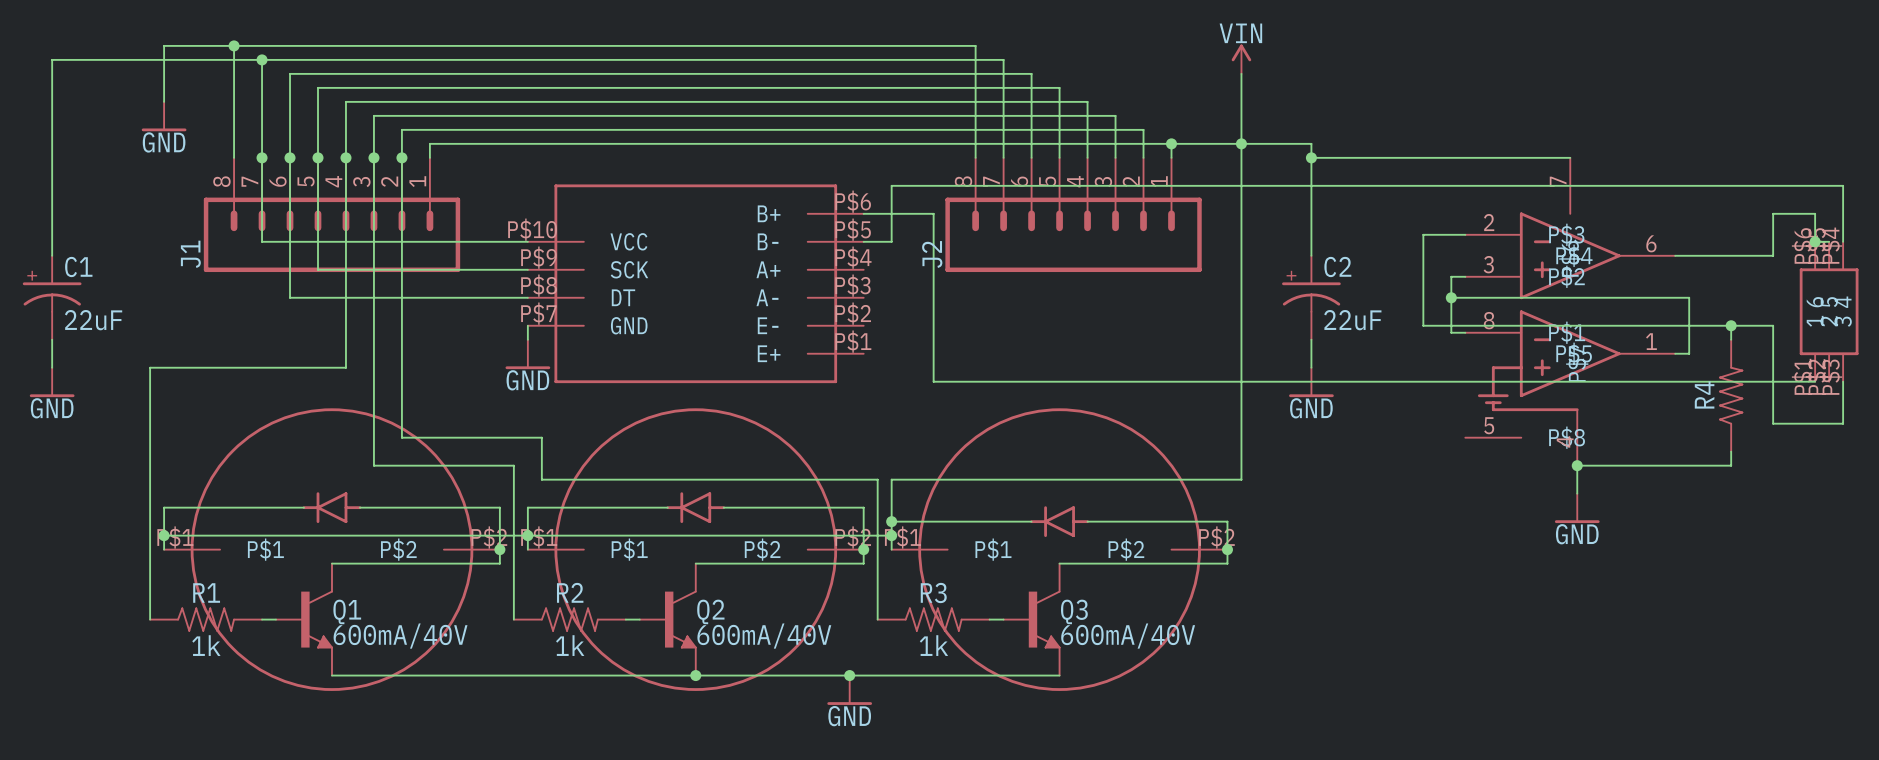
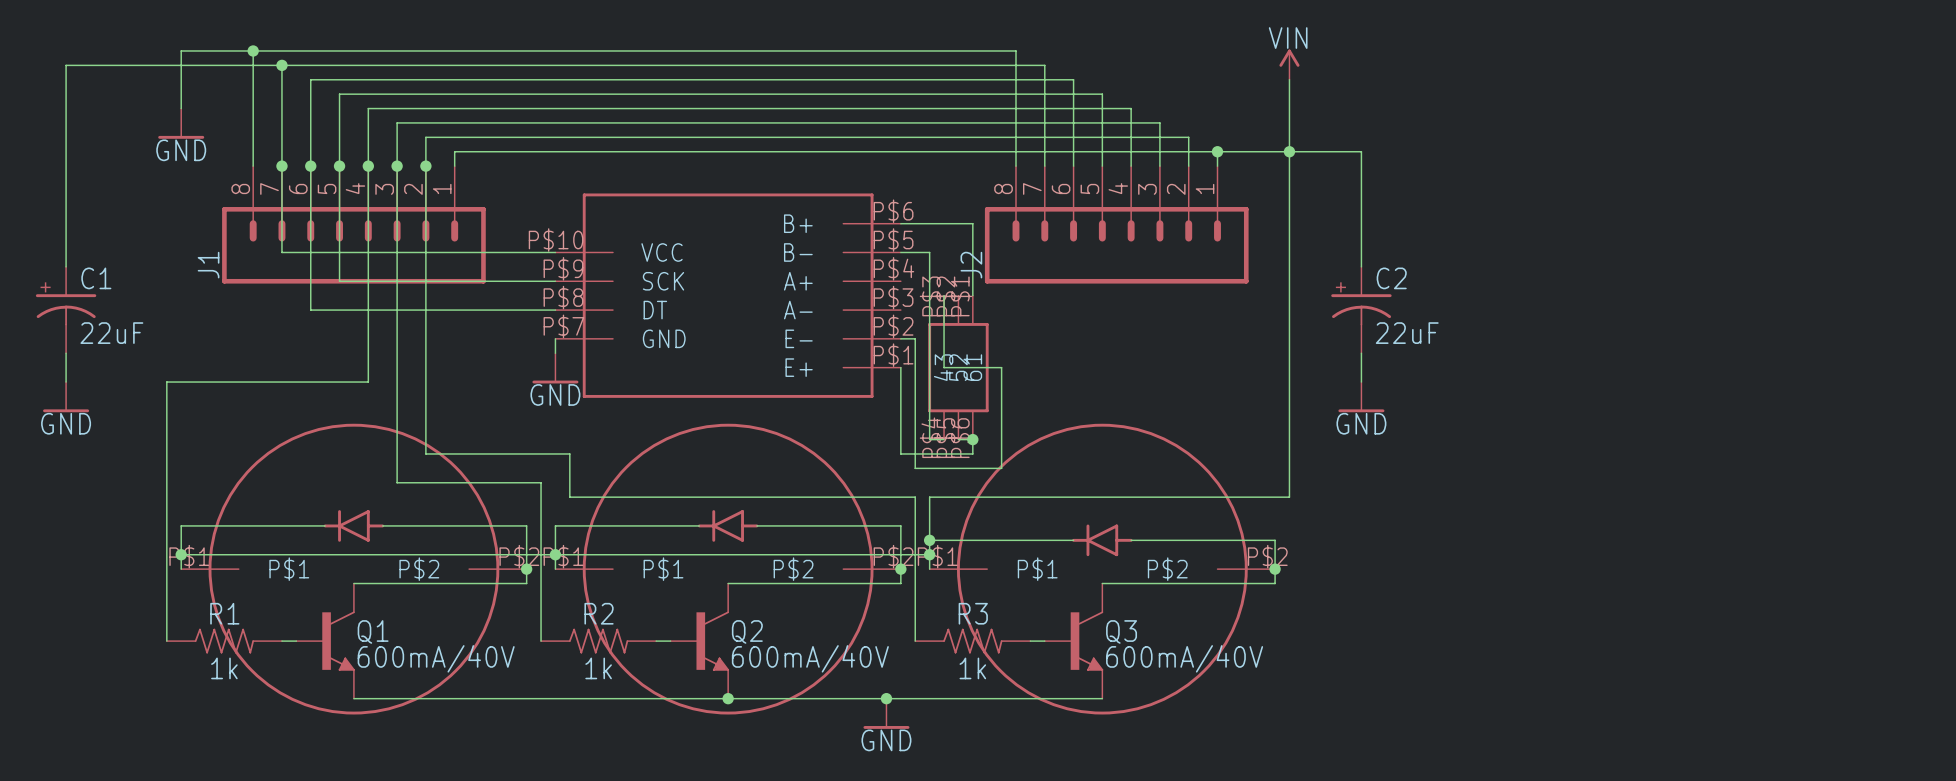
wire: (1311, 157) (1570, 157) -> none
junction: (1311, 157) -> none
wire: (1465, 234) (1423, 234) (1423, 325) (1773, 325) (1773, 423) (1843, 423) (1843, 381) -> none
wire: (891, 241) (891, 185) (1843, 185) (1843, 241) -> (929, 252) (929, 439) (944, 439)
junction: (1815, 241) -> none
wire: (1829, 241) (1815, 241) (1815, 213) (1773, 213) (1773, 255) (1675, 255) -> none
wire: (1465, 276) (1451, 276) (1451, 332) (1465, 332) -> none
wire: none -> (944, 295) (944, 367) (1001, 367) (1001, 468) (915, 468) (915, 338) (900, 338)
wire: (933, 283) (933, 381) (1815, 381) -> none
wire: (1451, 297) (1689, 297) (1689, 353) (1675, 353) -> none
junction: (1451, 297) -> none
part: (1570, 311) -> none
part: (1829, 311) -> none
wire: (1731, 325) (1731, 339) -> none
junction: (1731, 325) -> none
wire: none -> (900, 367) (900, 453) (972, 453) (972, 439) (958, 439)
part: none -> (958, 367)
R4: (1731, 395) -> none
junction: none -> (972, 439)
wire: (1731, 451) (1731, 465) (1577, 465) (1577, 493) -> none
junction: (1577, 465) -> none
power symbol: GND (1577, 508) -> none

